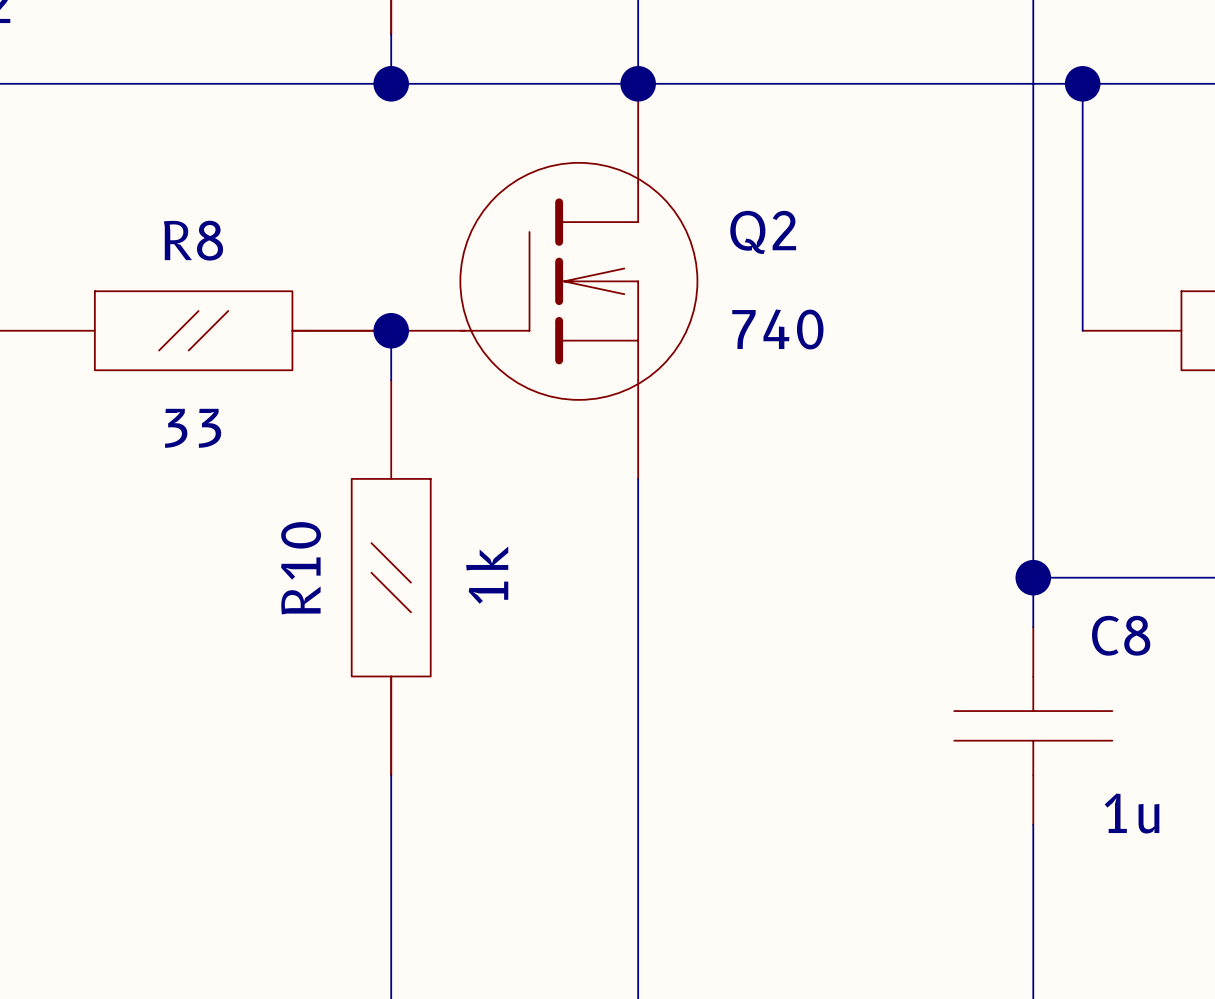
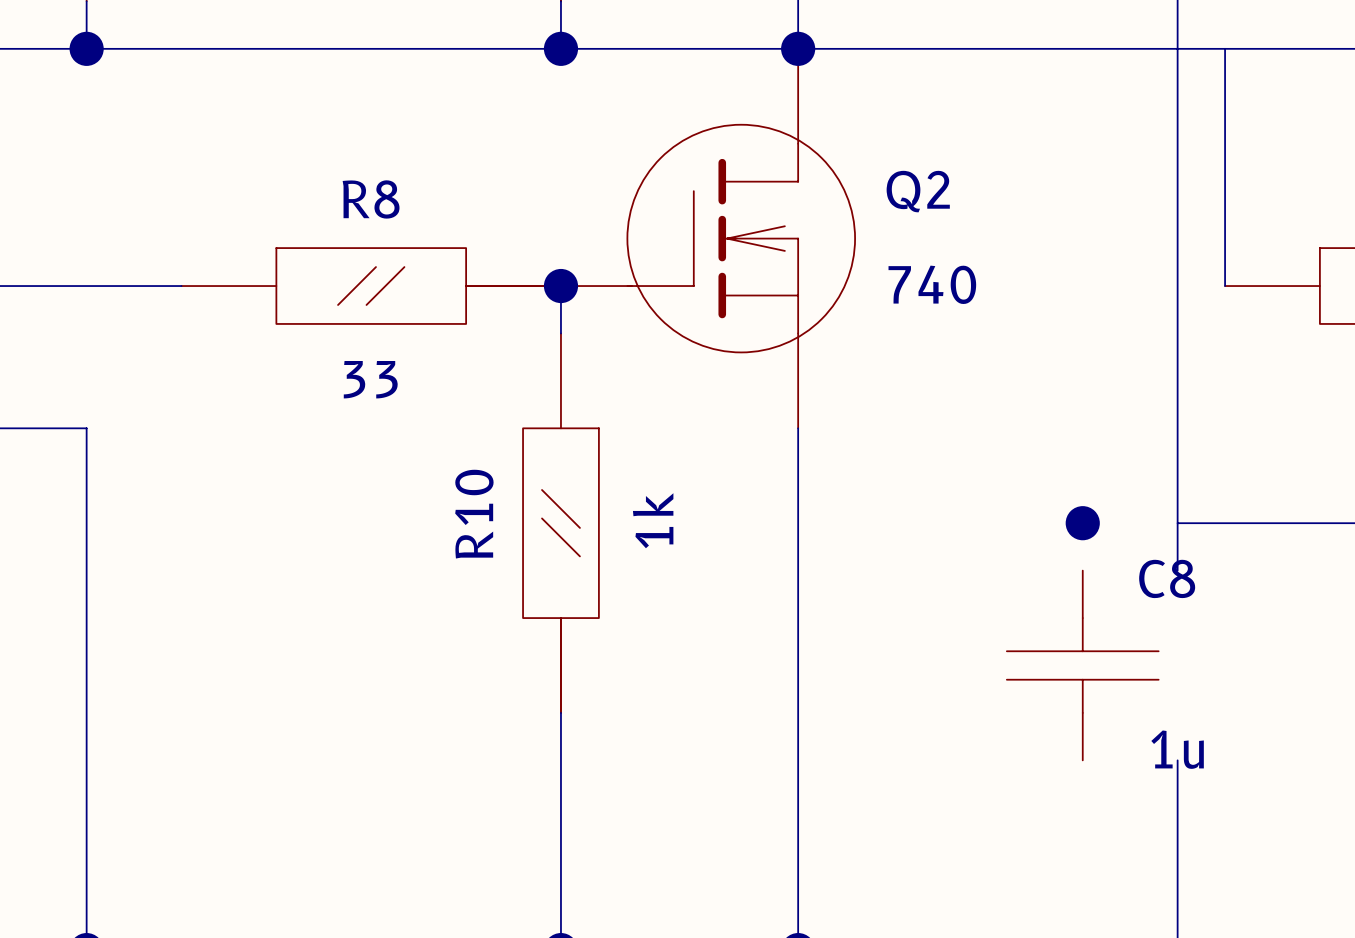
junction: (1082, 83) -> none
junction position: (1033, 577) -> (1082, 523)
C8 position: (1033, 725) -> (1082, 665)

